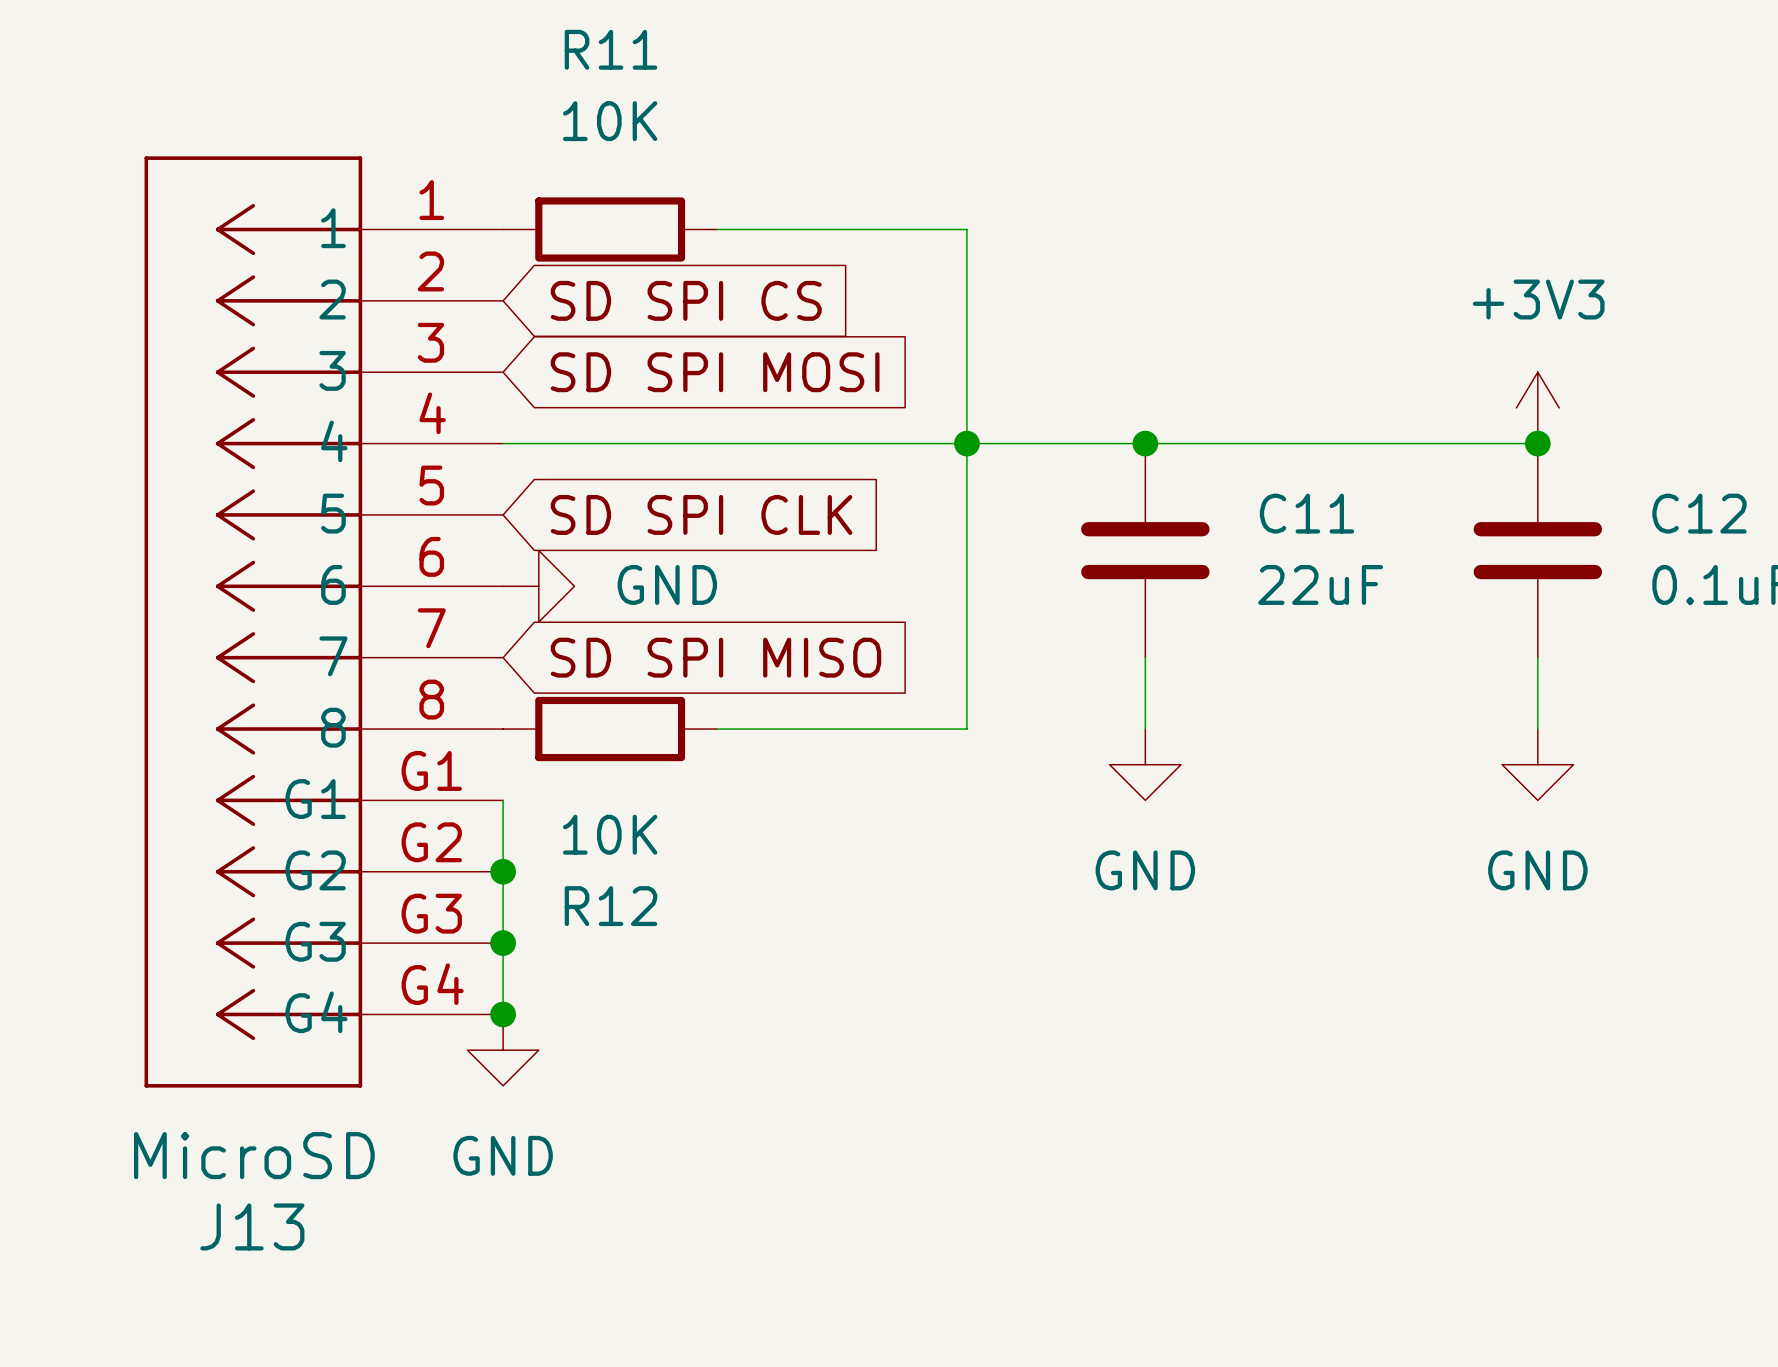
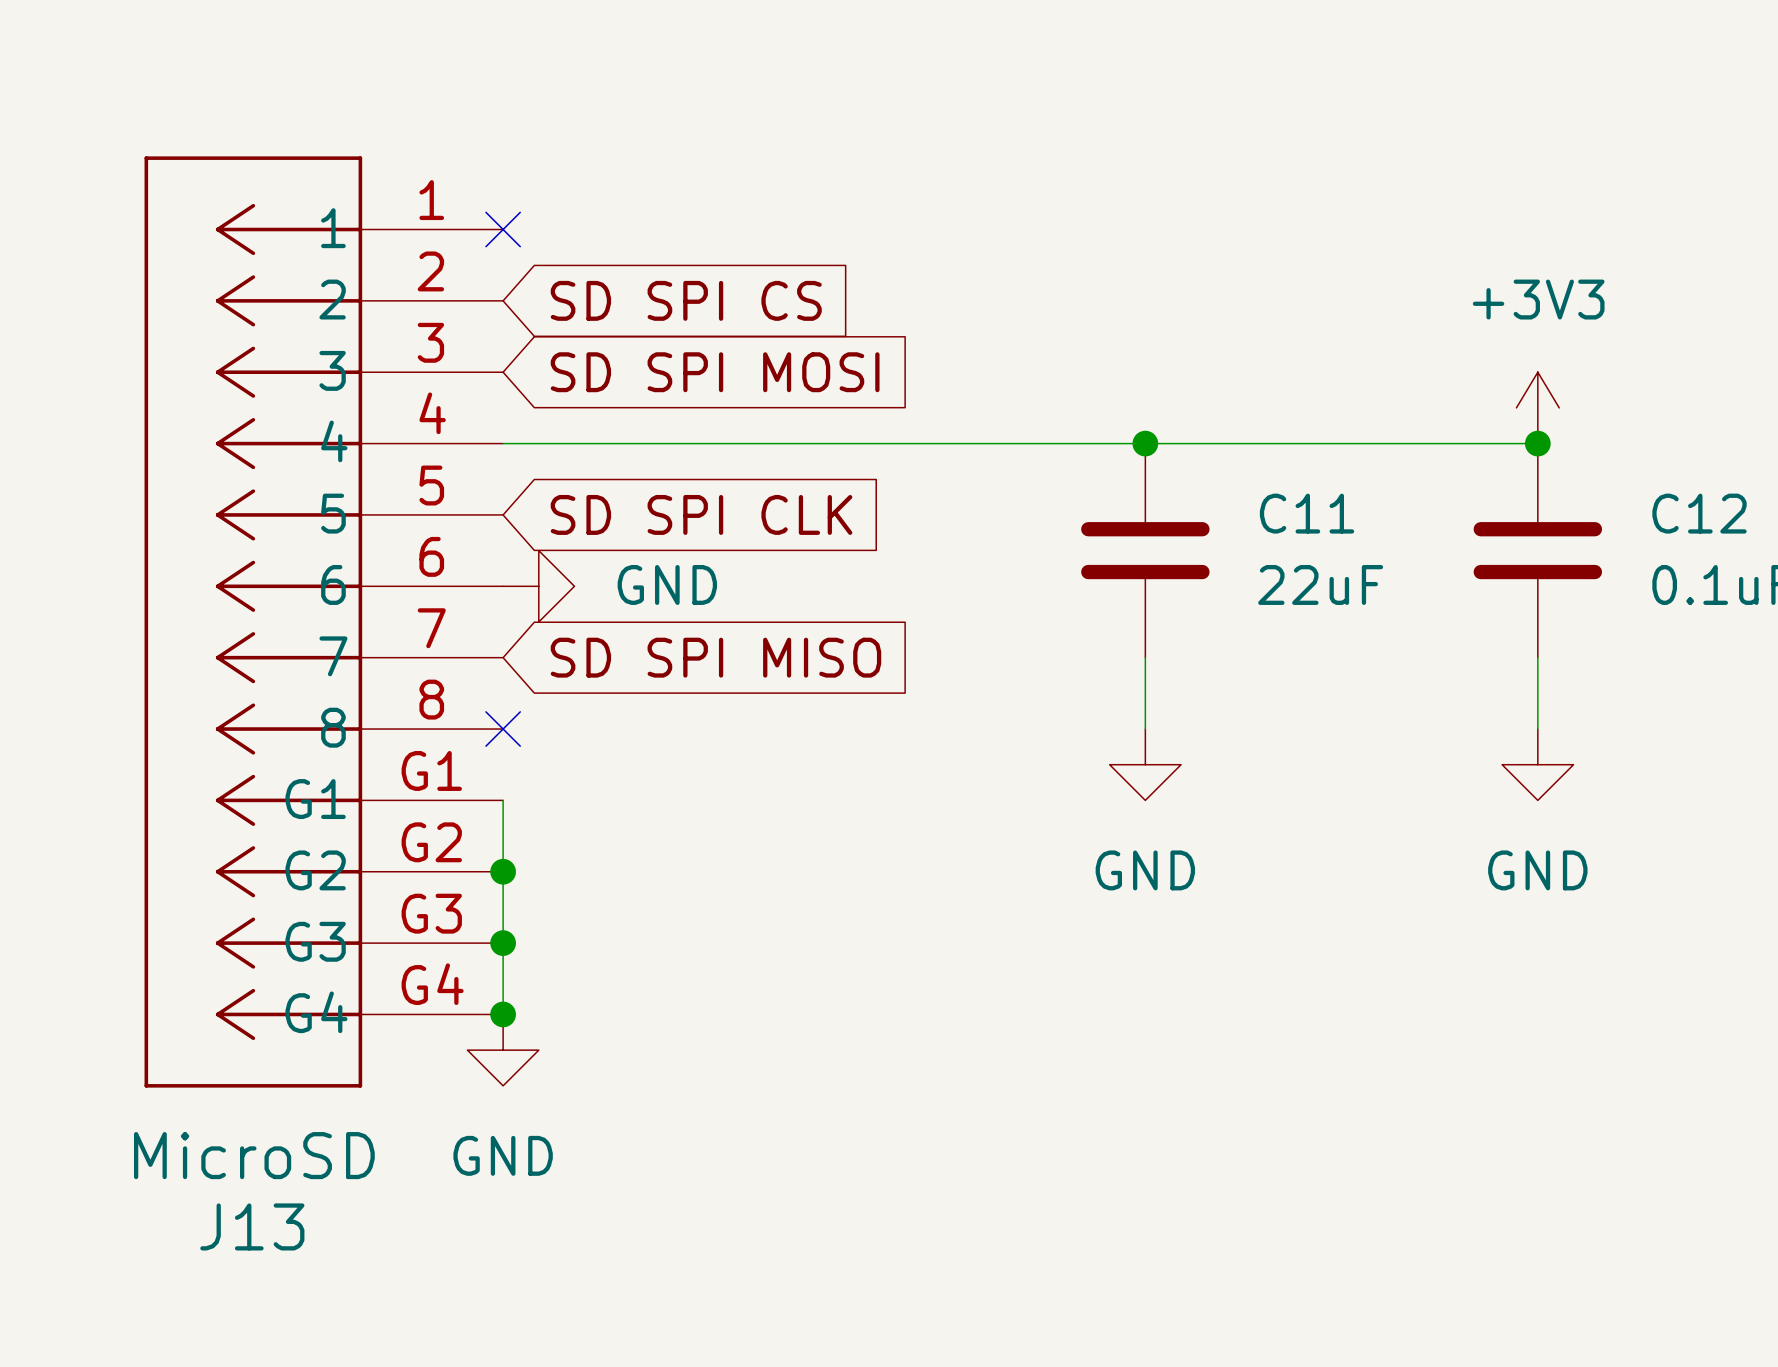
no-connect mark: none -> (503, 229)
R11: 10K (610, 229) -> none
wire: (717, 229) (966, 229) (966, 729) (717, 729) -> none
junction: (966, 443) -> none
no-connect mark: none -> (503, 729)
R12: 10K (610, 729) -> none

